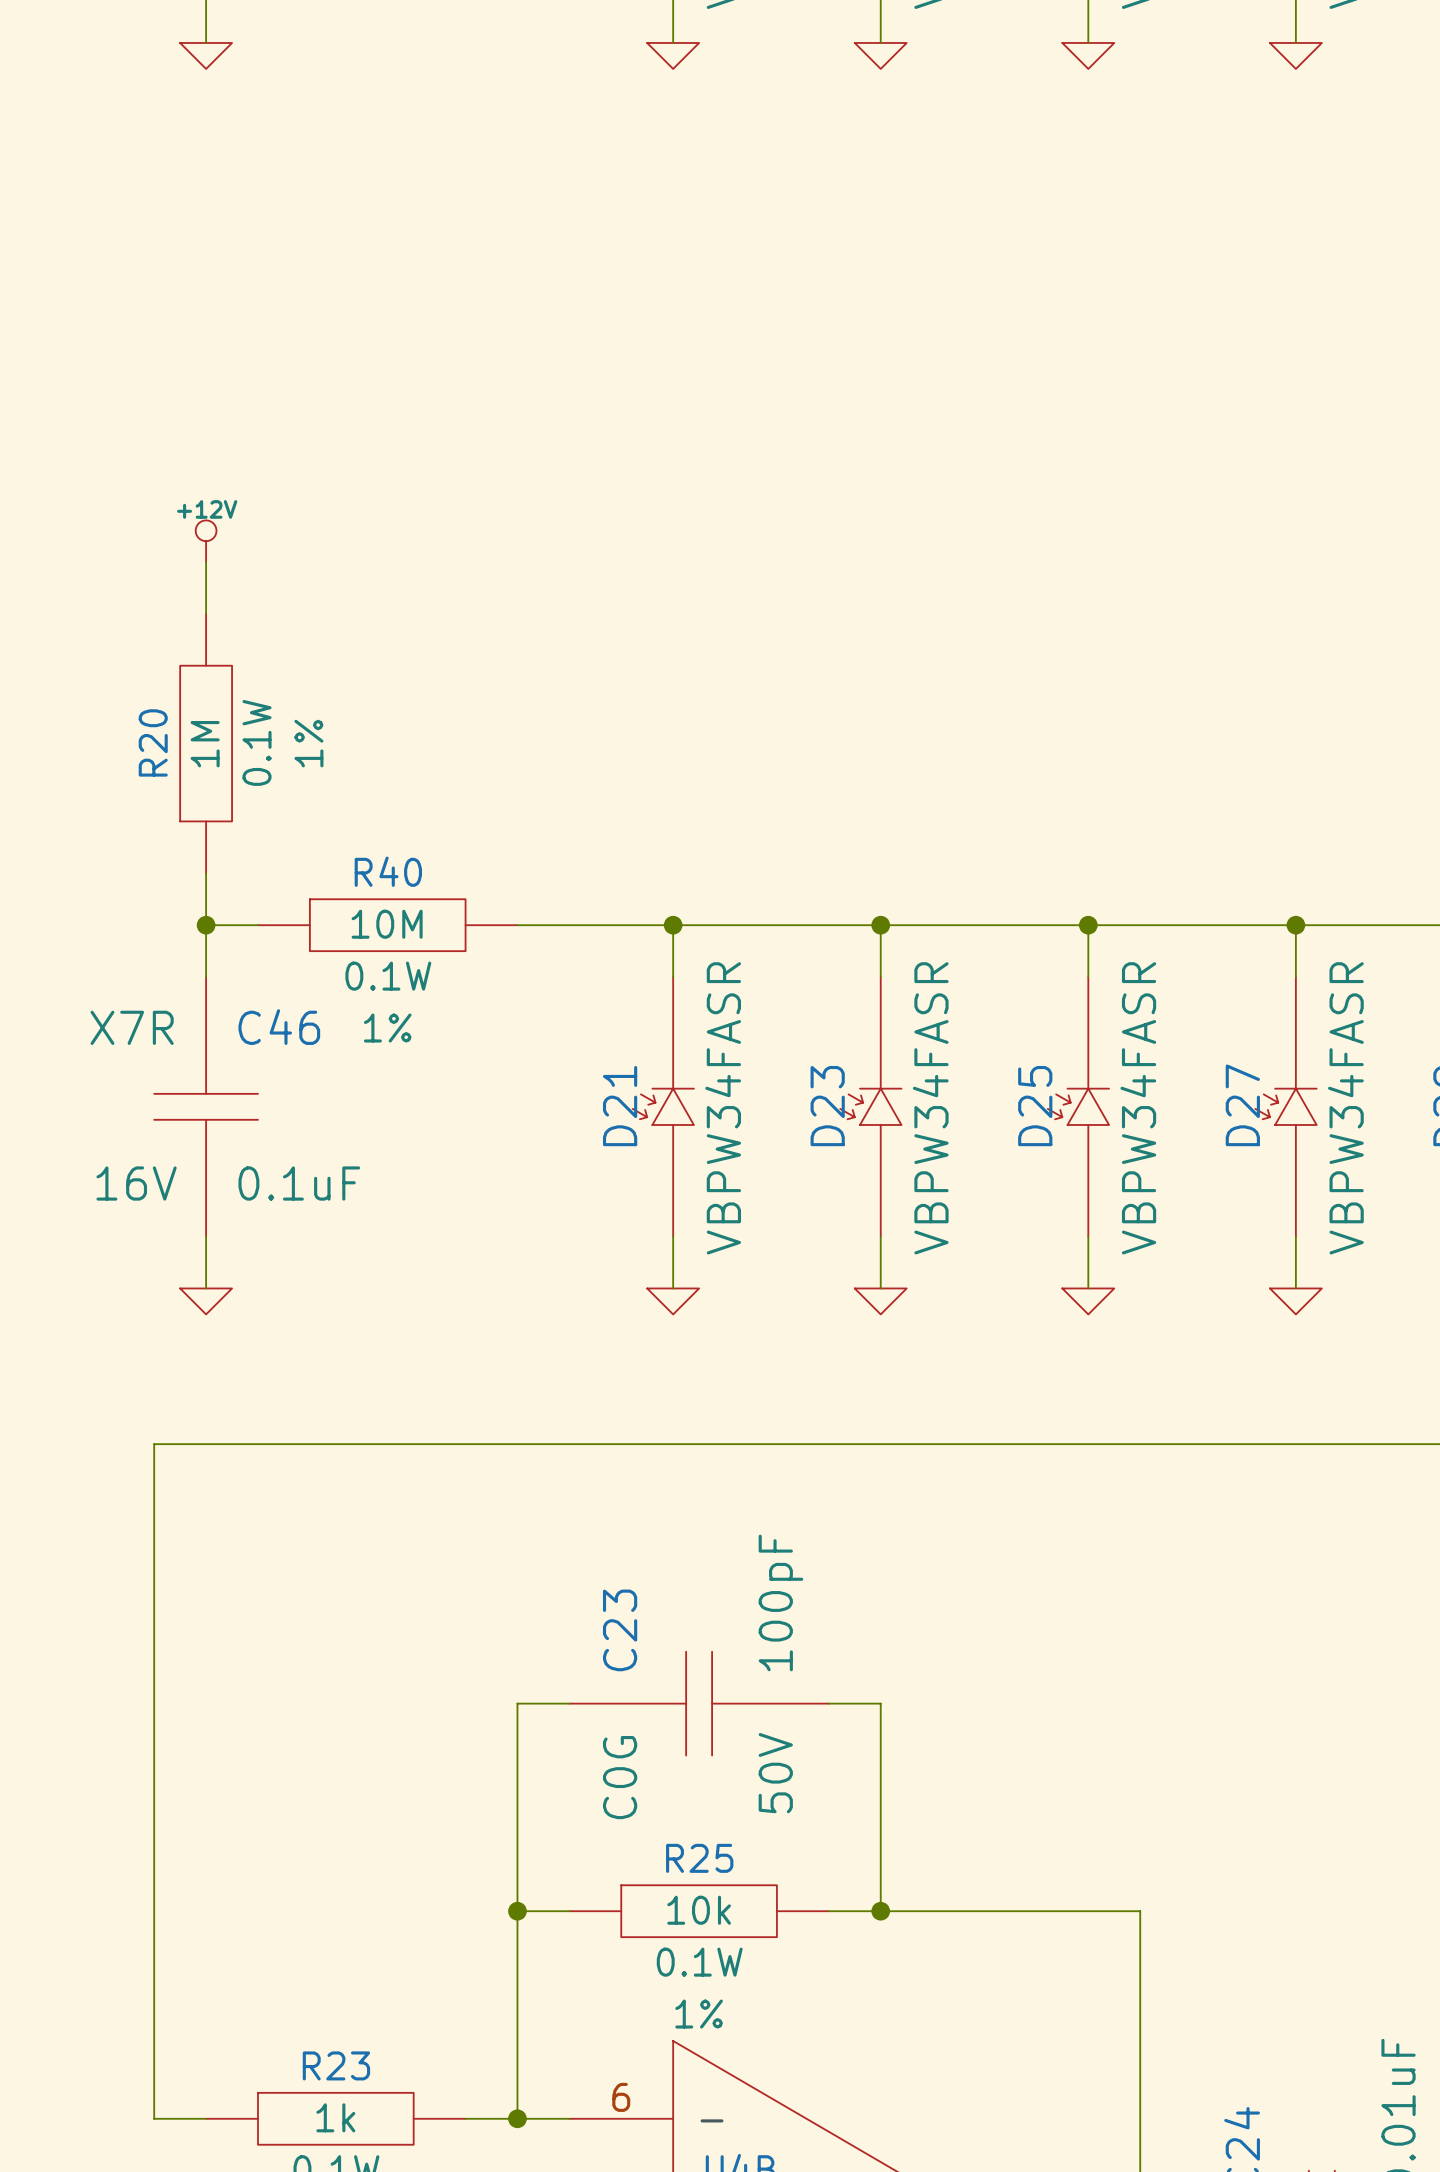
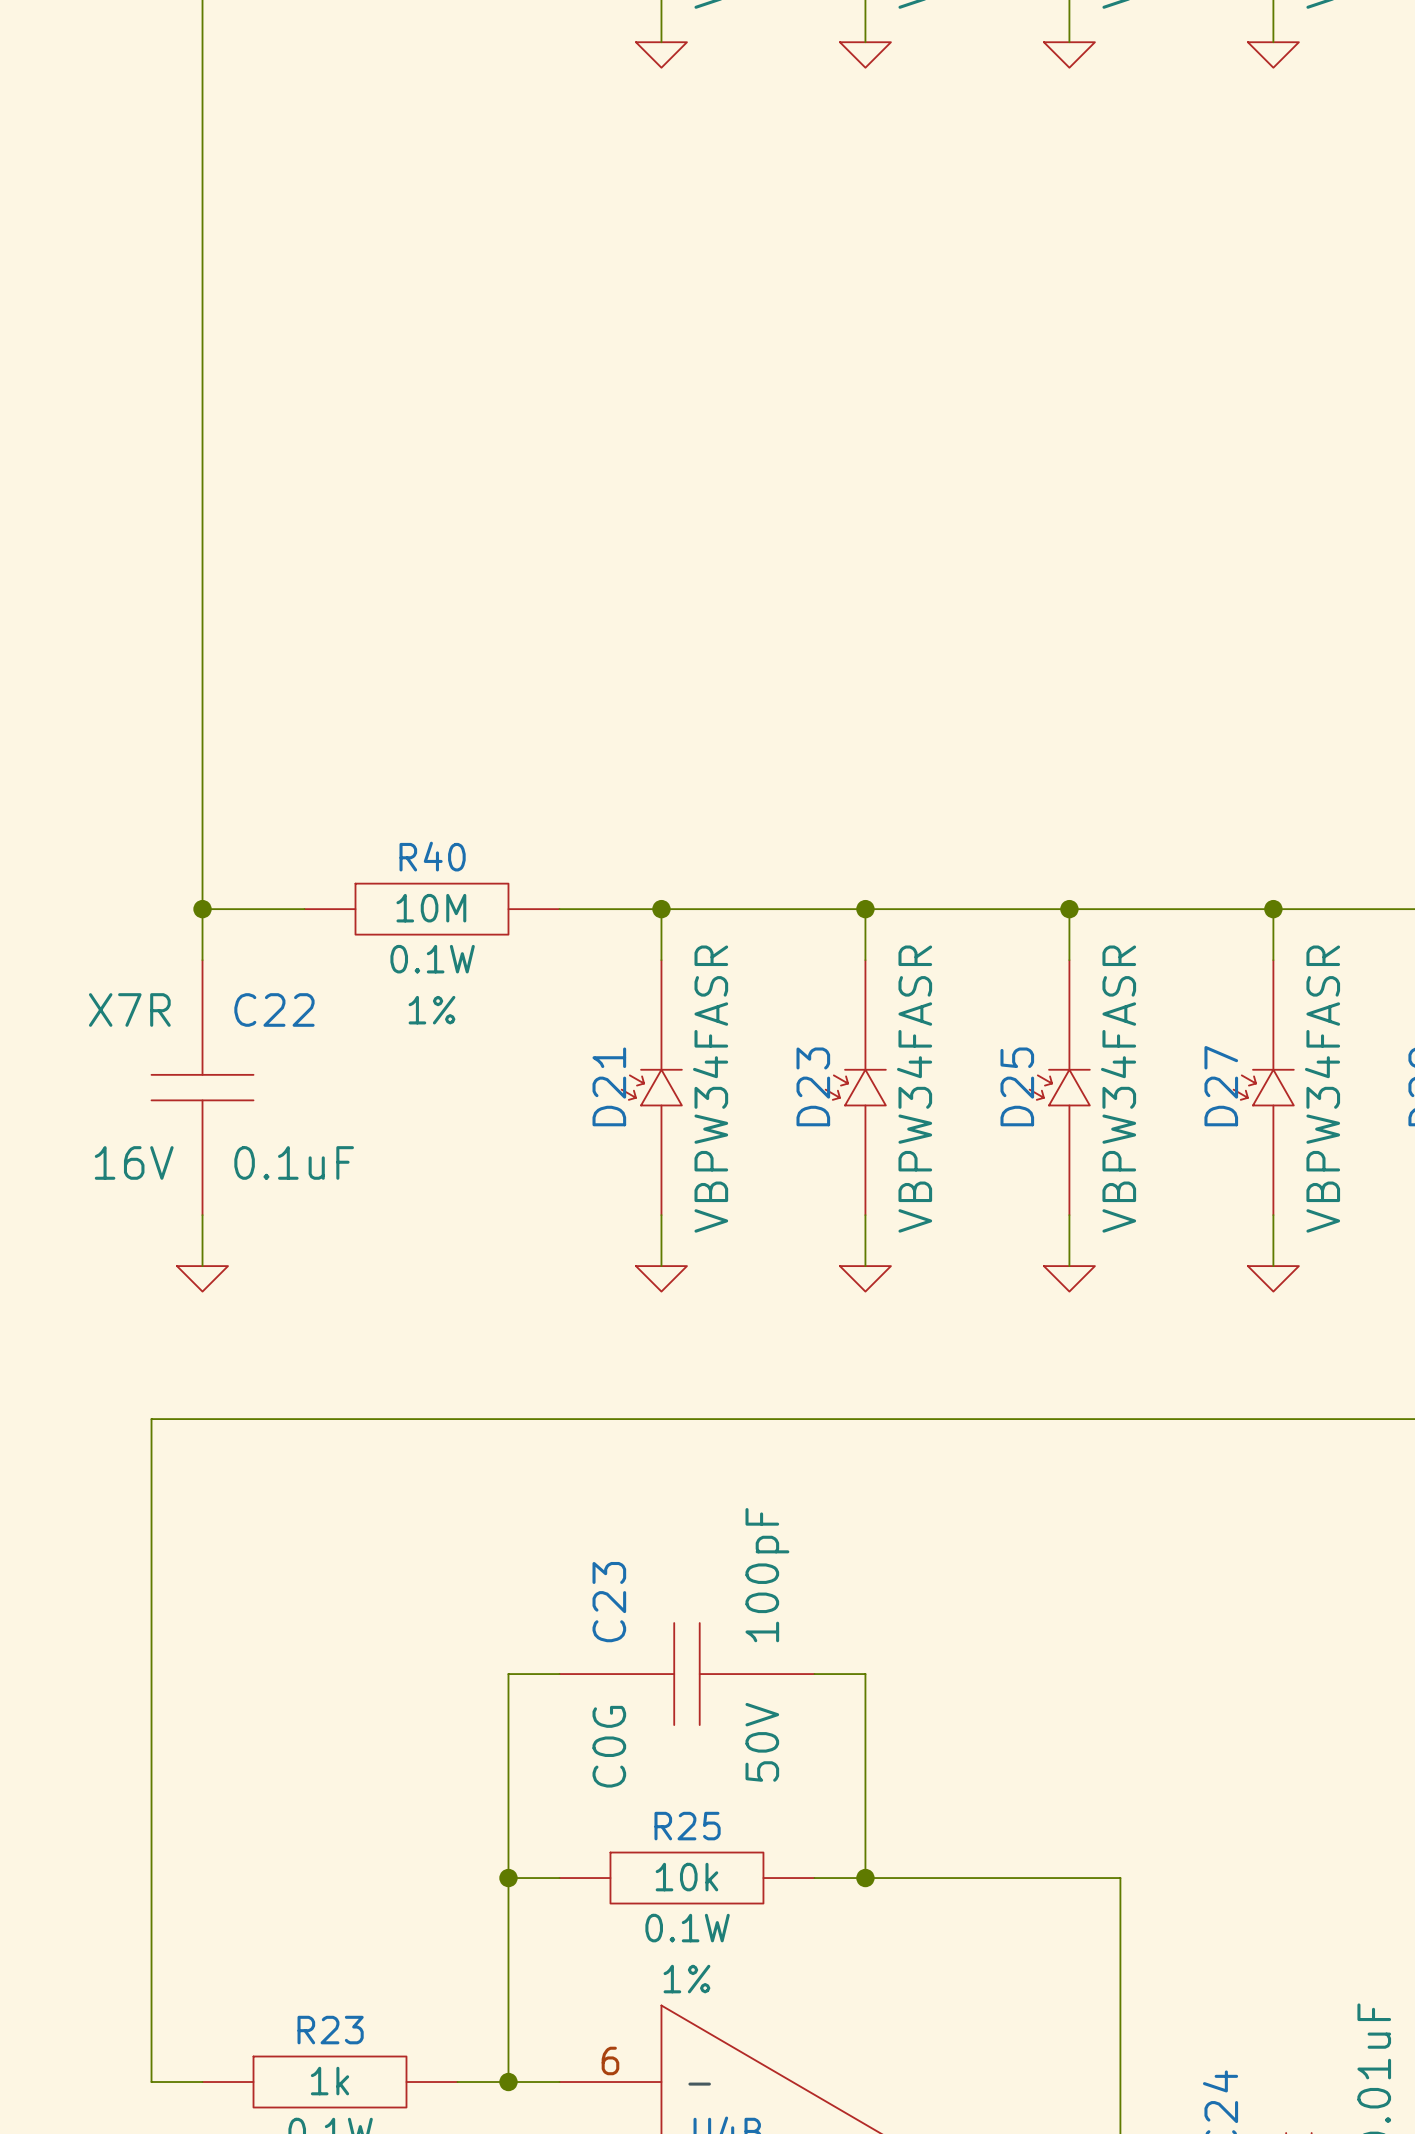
wire: none -> (202, 42) (202, 552)
power symbol: (206, 55) -> none
power symbol: +12V (206, 541) -> none
wire: none -> (202, 603) (202, 858)
R20: 1M (206, 743) -> none
R40 position: (387, 925) -> (431, 909)
C46 name: C46 (279, 1027) -> C22 (274, 1009)

